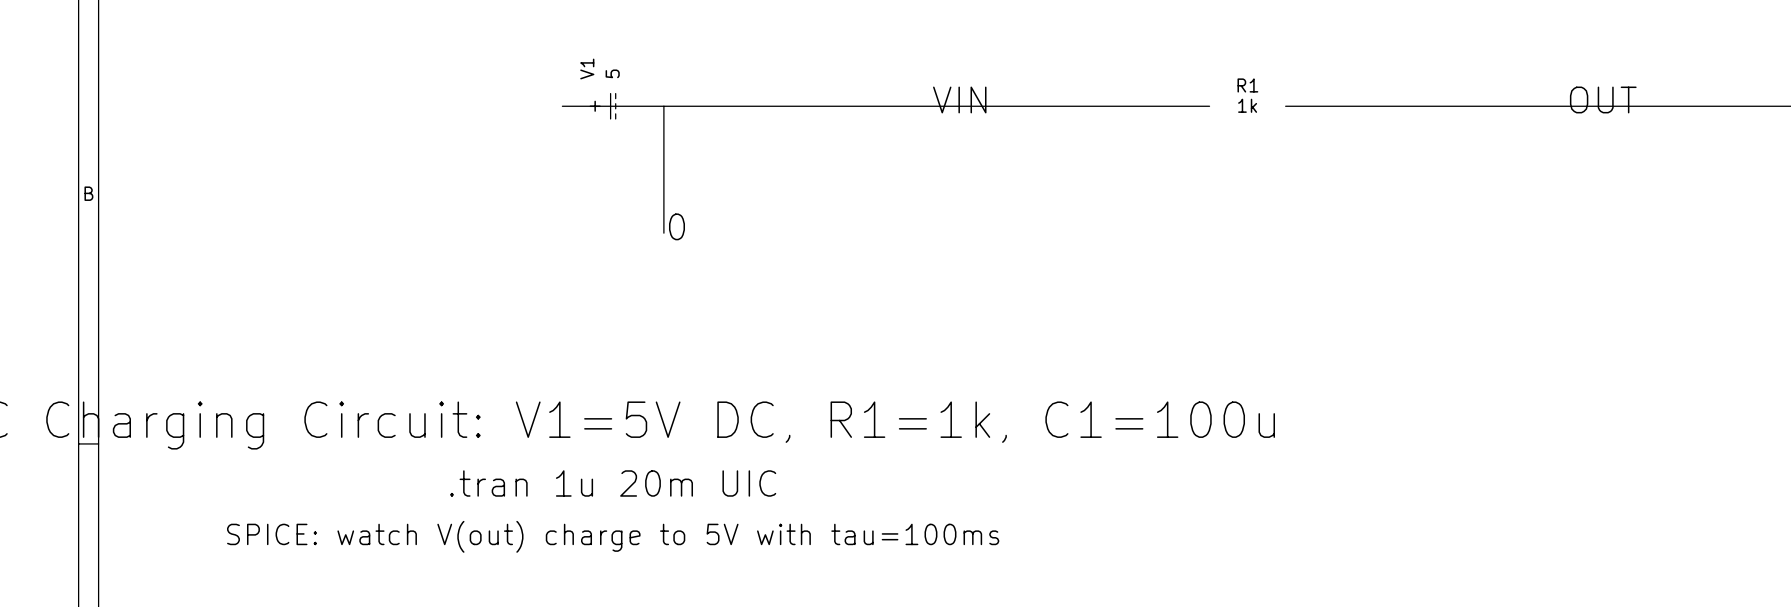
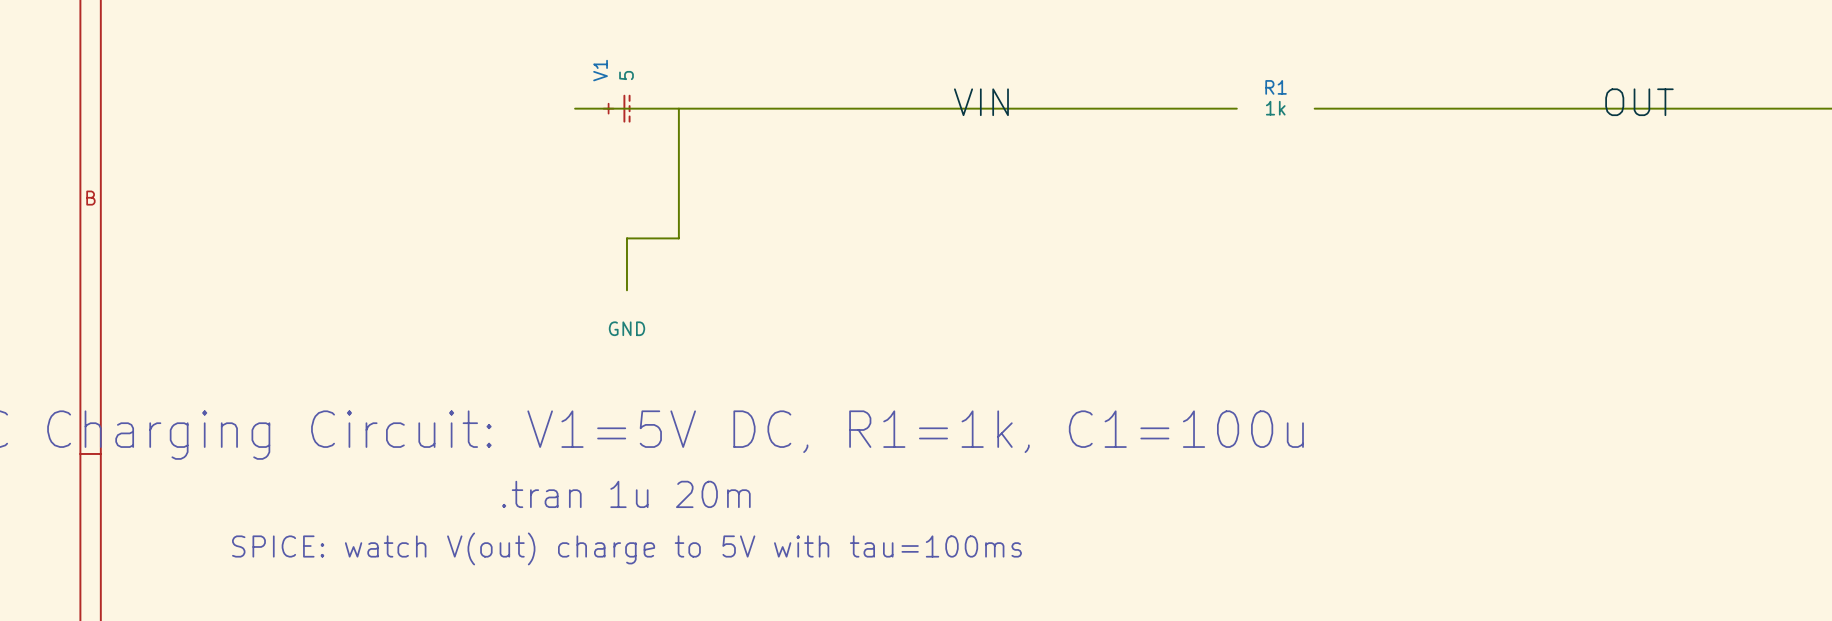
label: 0 (676, 226) -> none
wire: none -> (678, 238) (626, 238) (626, 290)
power symbol: none -> GND (626, 328)
text: .tran 1u 20m UIC (613, 483) -> .tran 1u 20m (626, 494)

